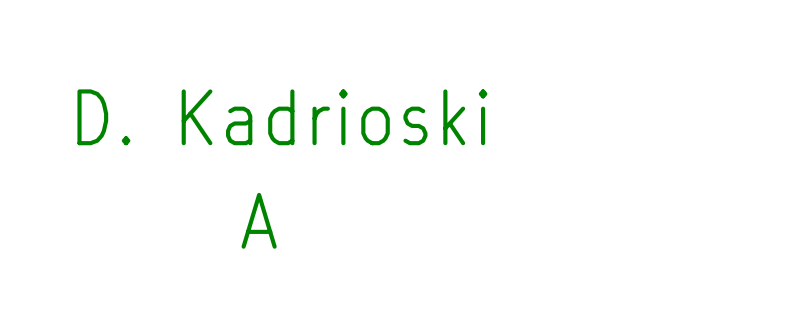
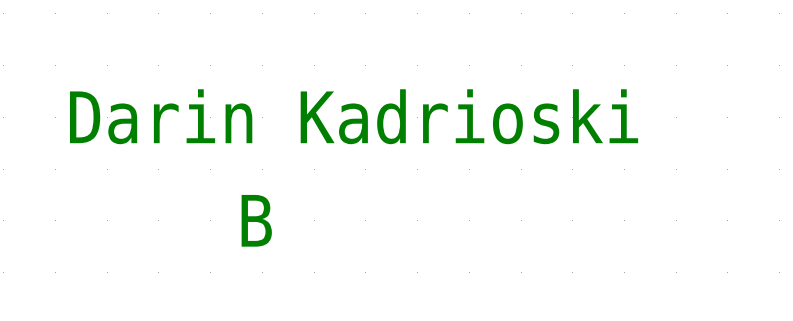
text: D. Kadrioski (282, 117) -> Darin Kadrioski (354, 116)
text: A (259, 220) -> B (256, 220)

